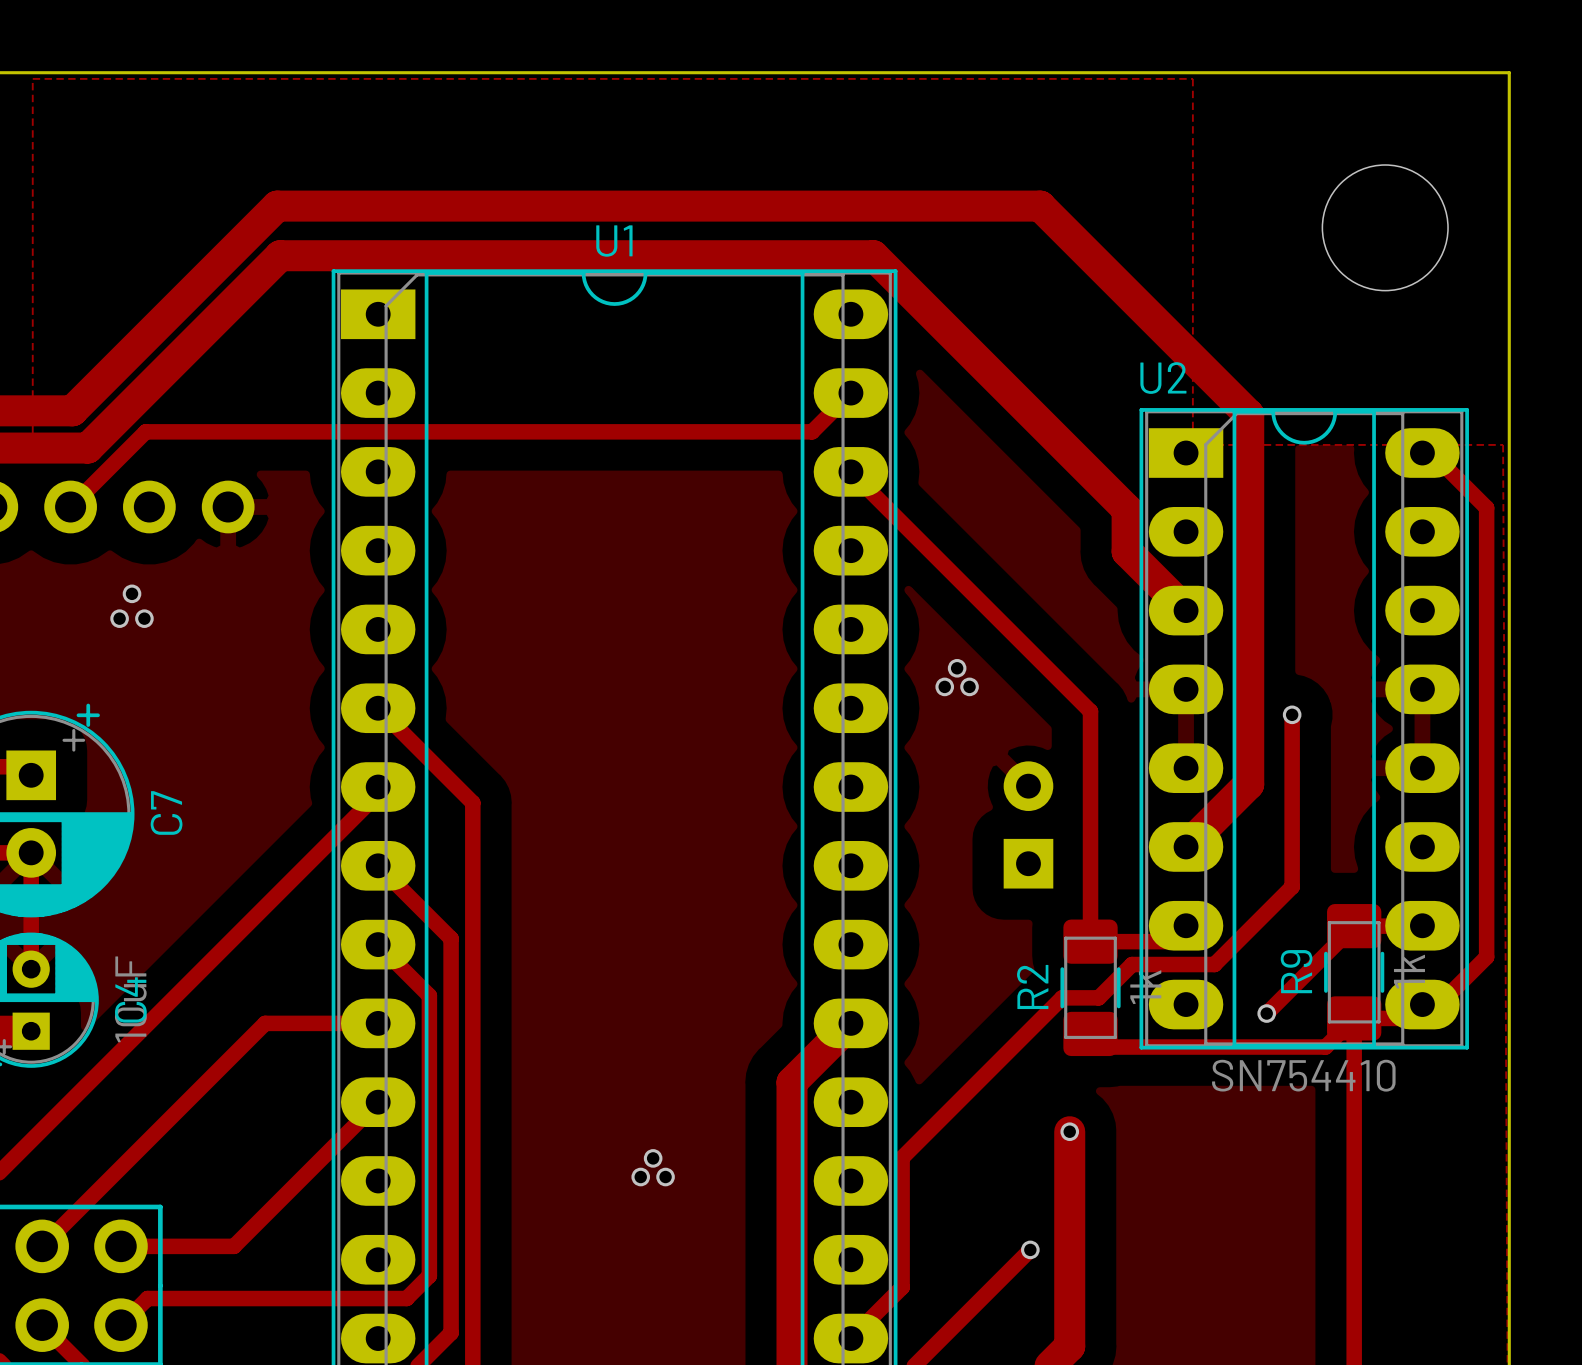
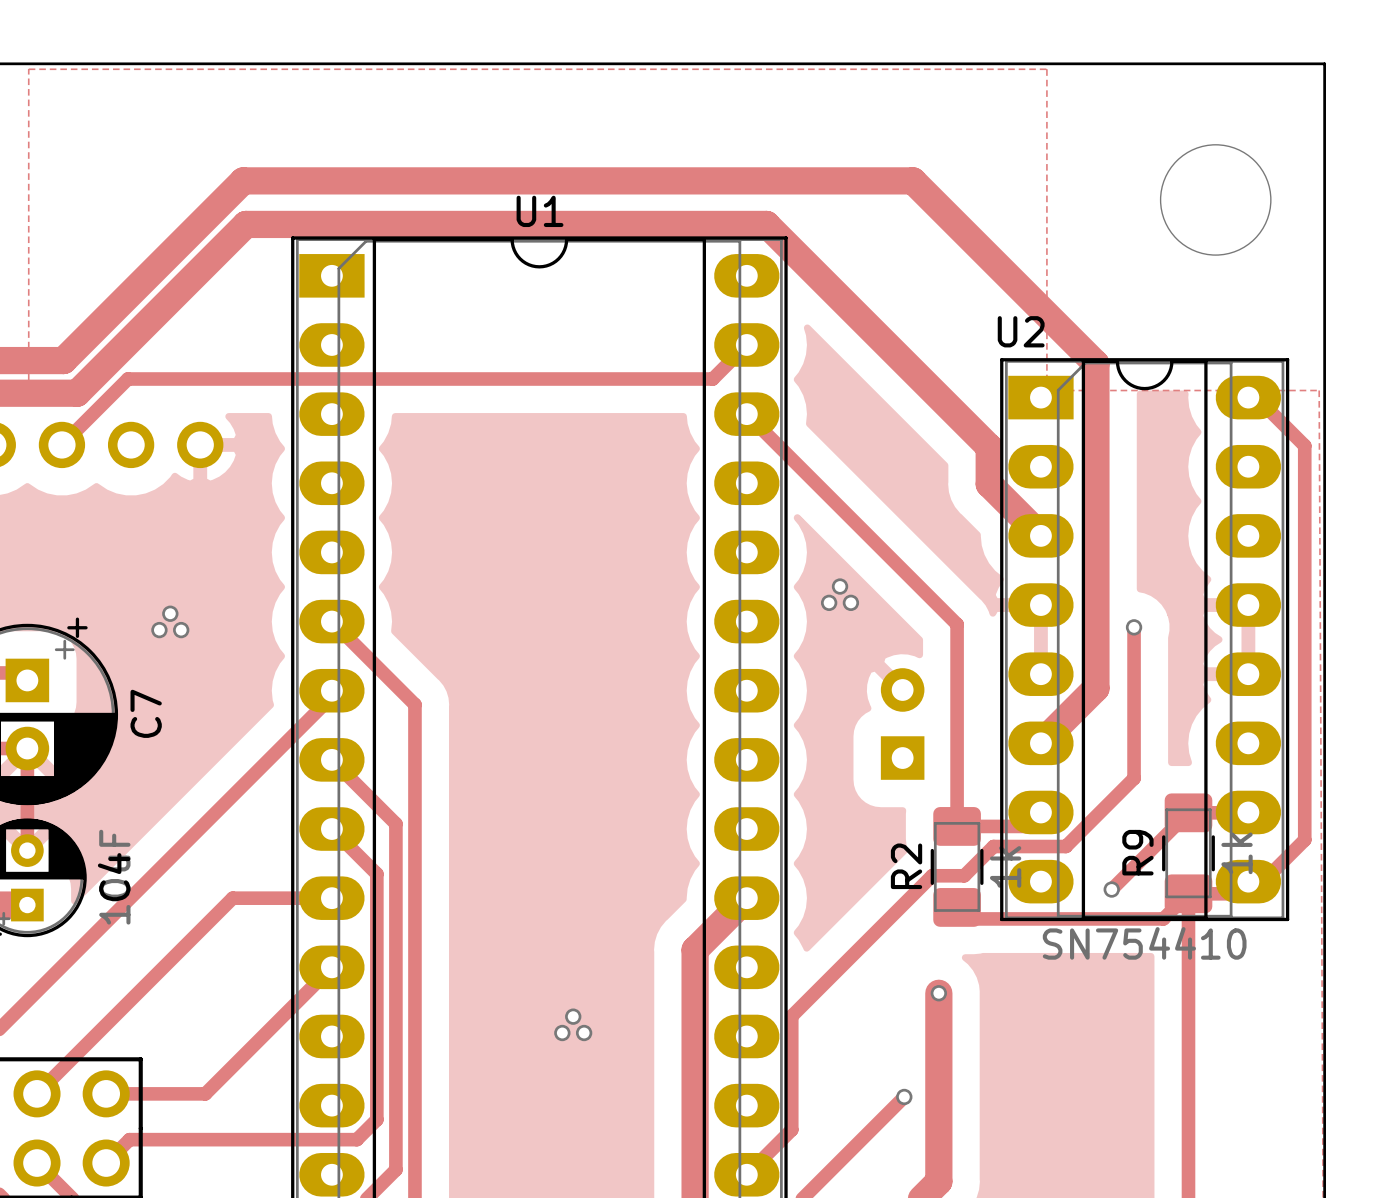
via: (132, 593) -> none
via: (119, 618) -> none
via: (144, 618) -> none
via: none -> (170, 613)
via: none -> (159, 630)
via: none -> (181, 630)

